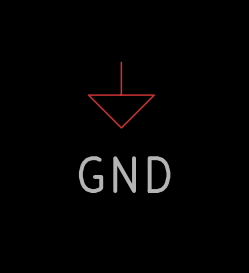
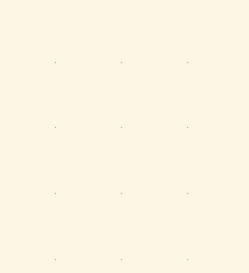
power symbol: GND (121, 95) -> none

